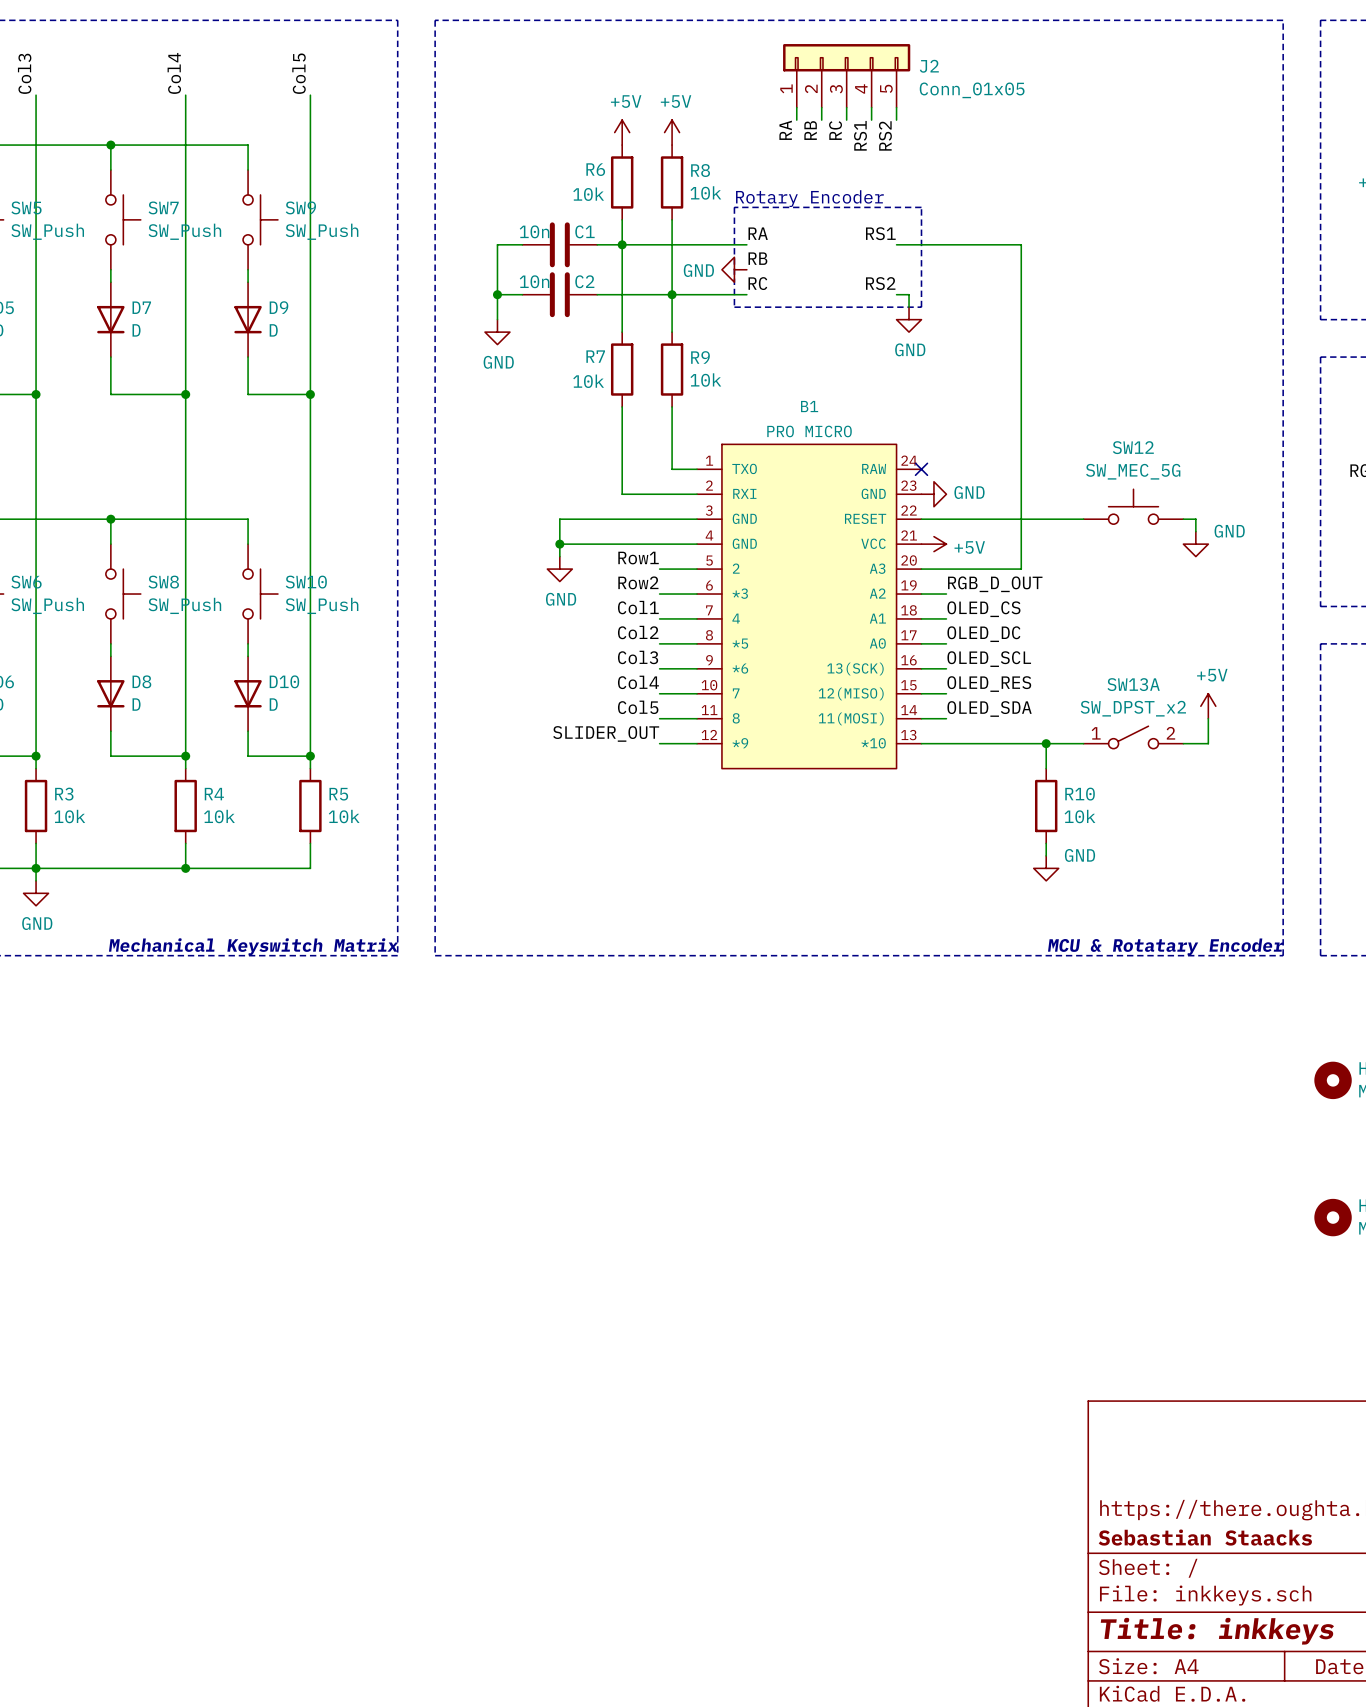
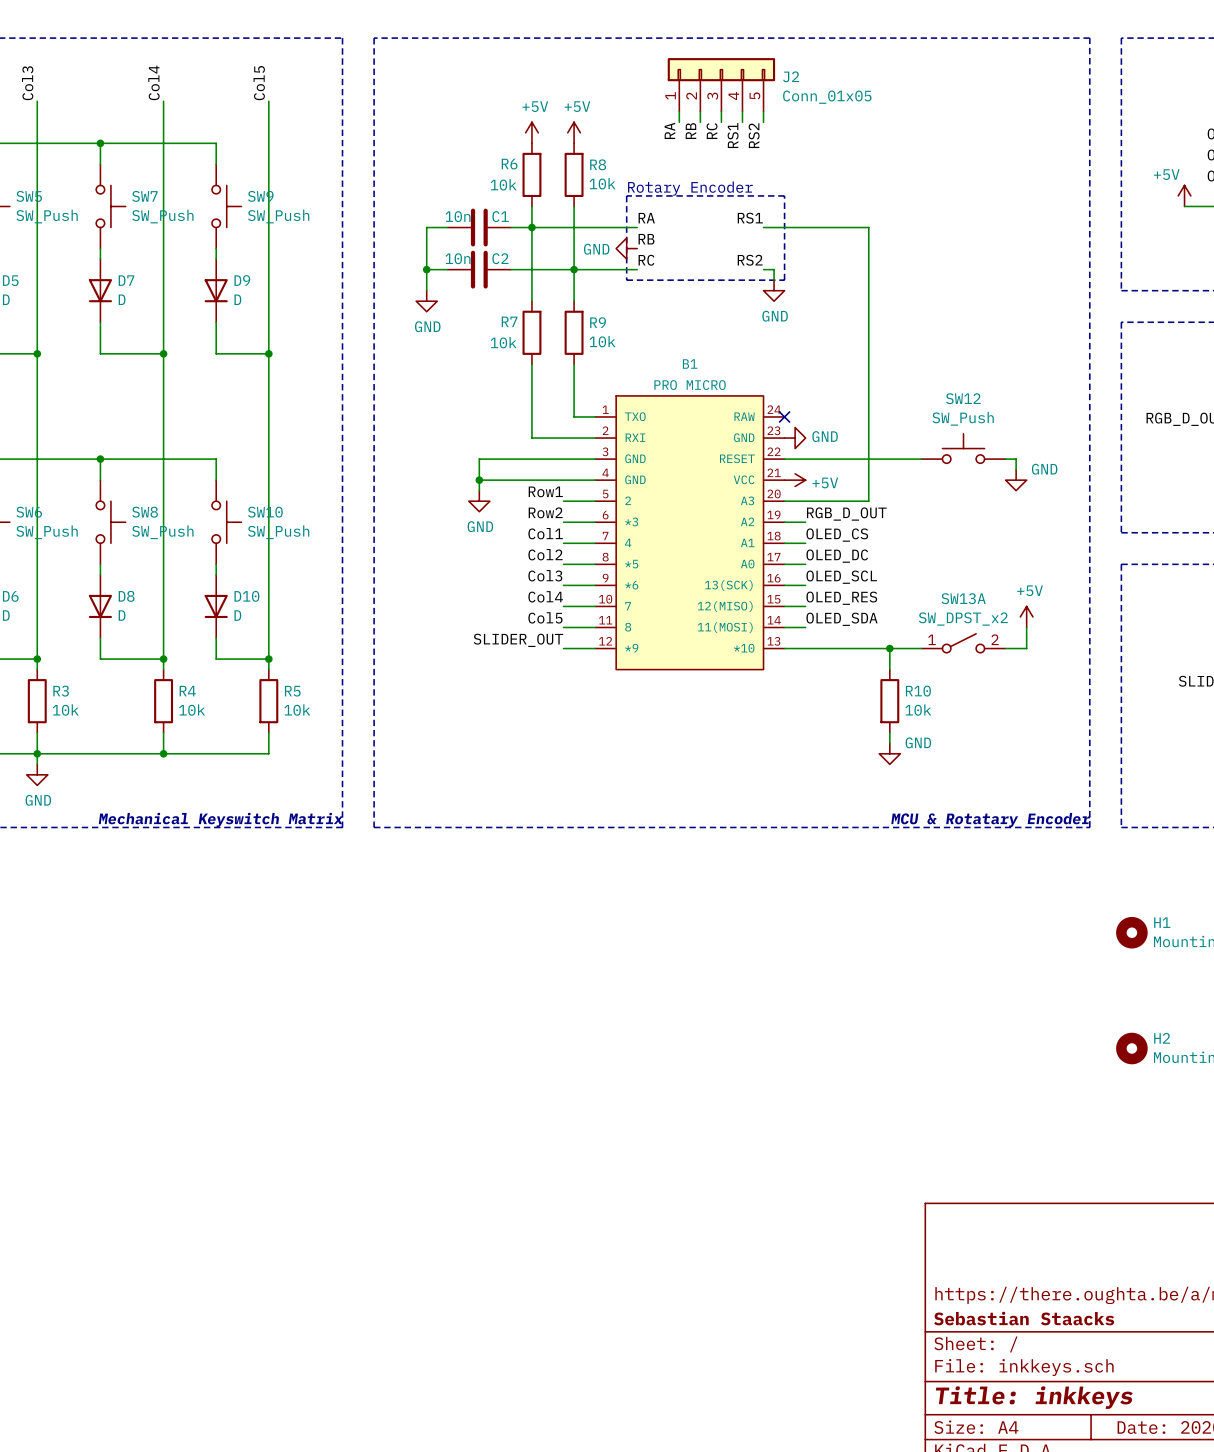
SW12 value: SW_MEC_5G (1133, 471) -> SW_Push (963, 418)

